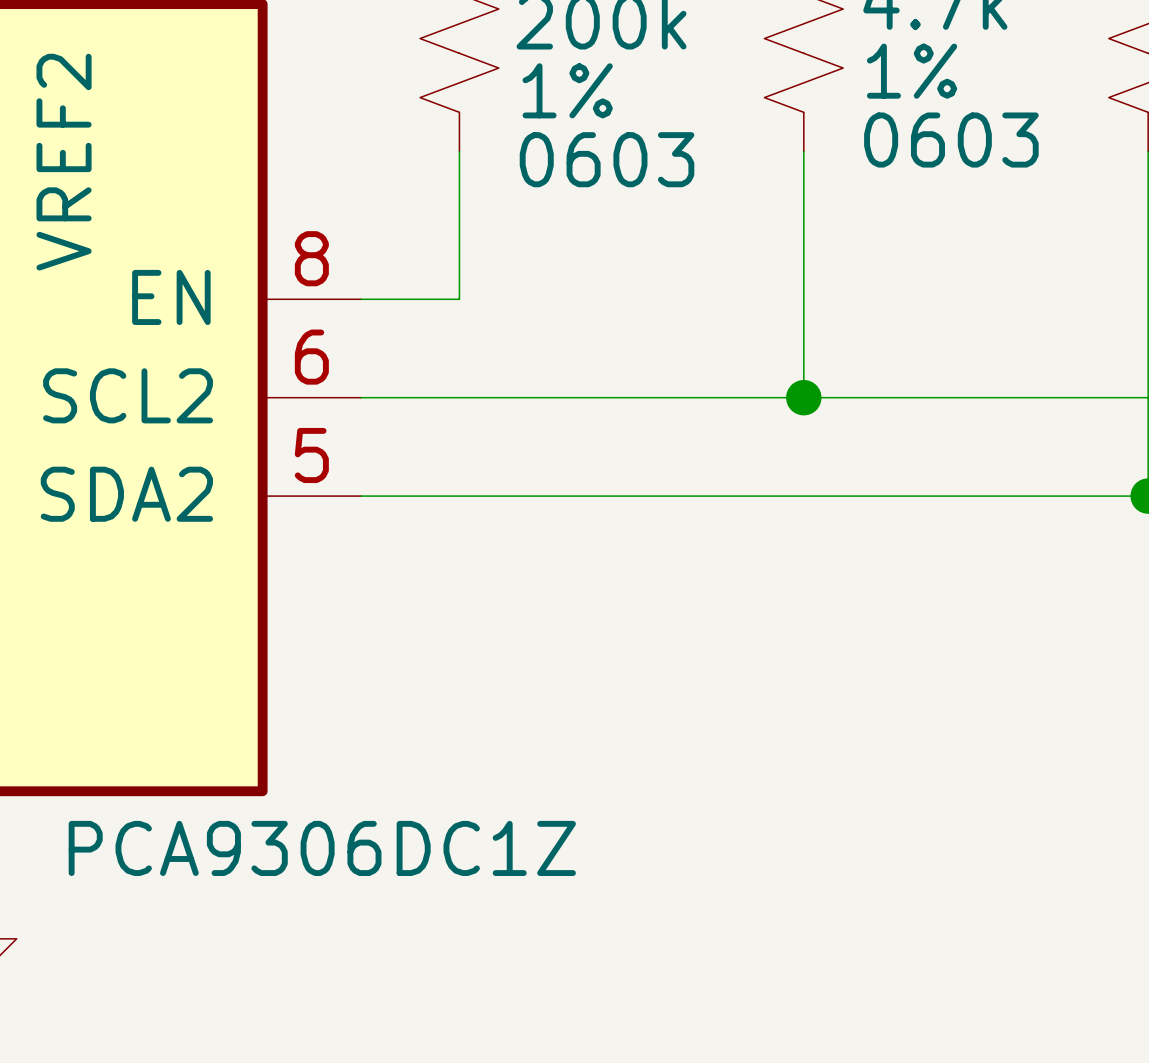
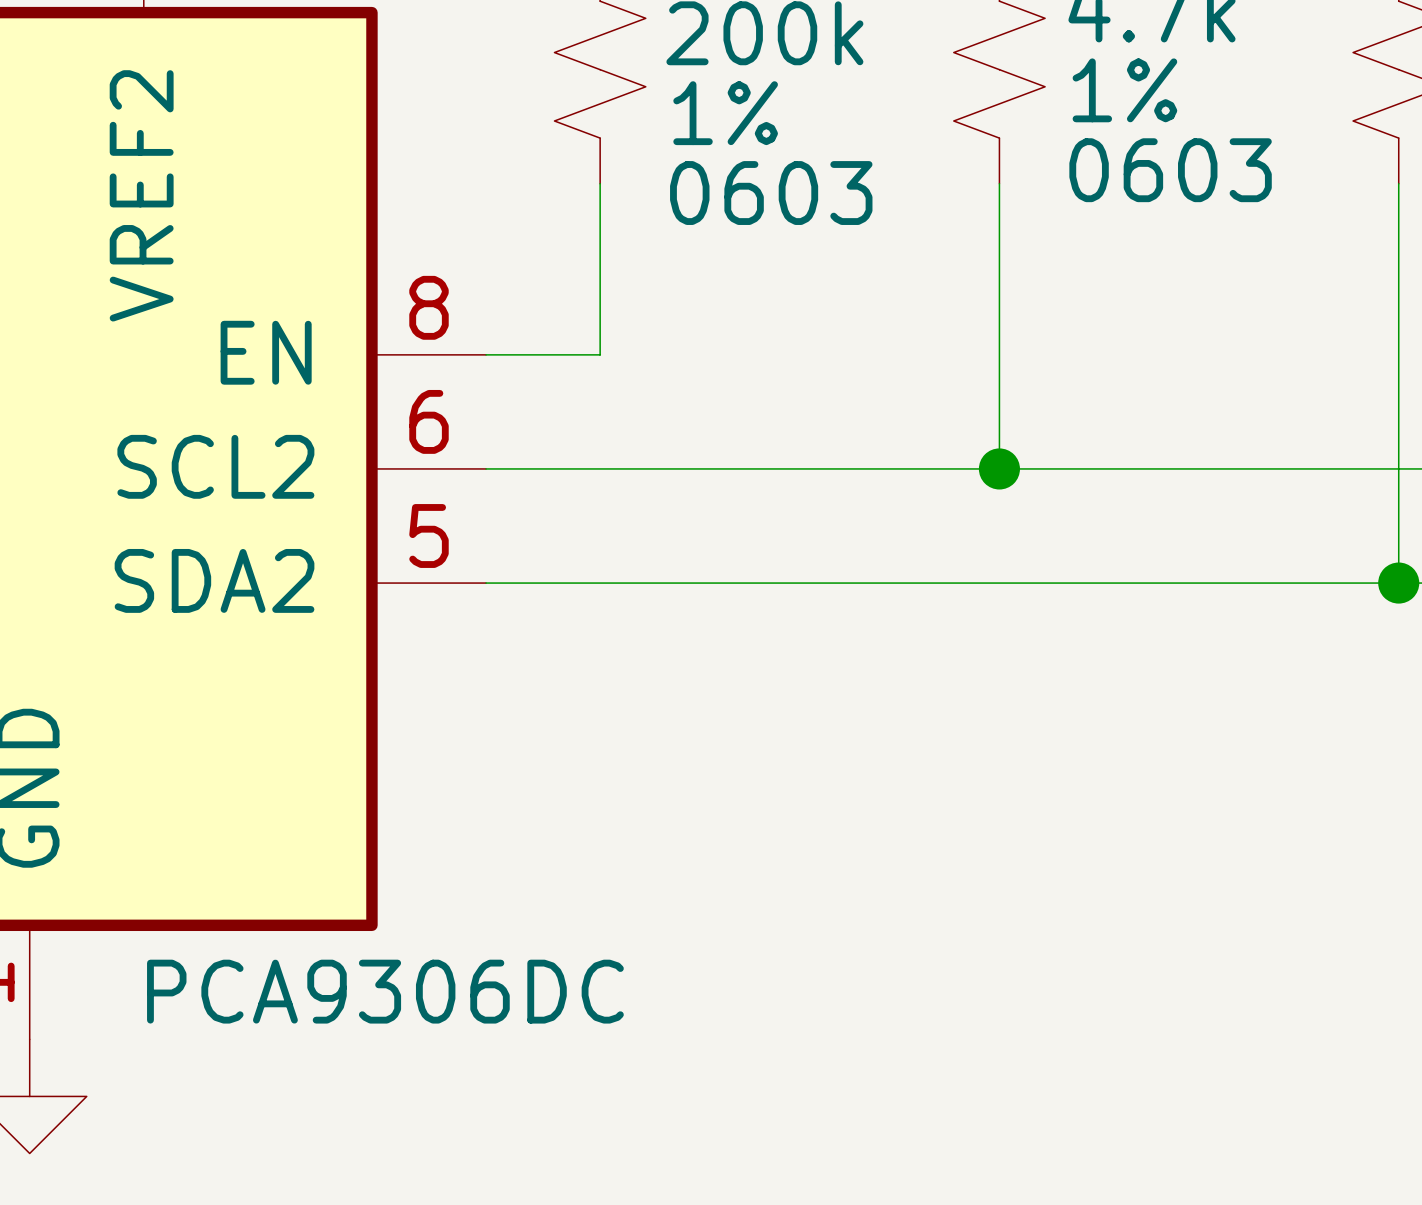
part value: PCA9306DC1Z (322, 848) -> PCA9306DC (385, 991)

